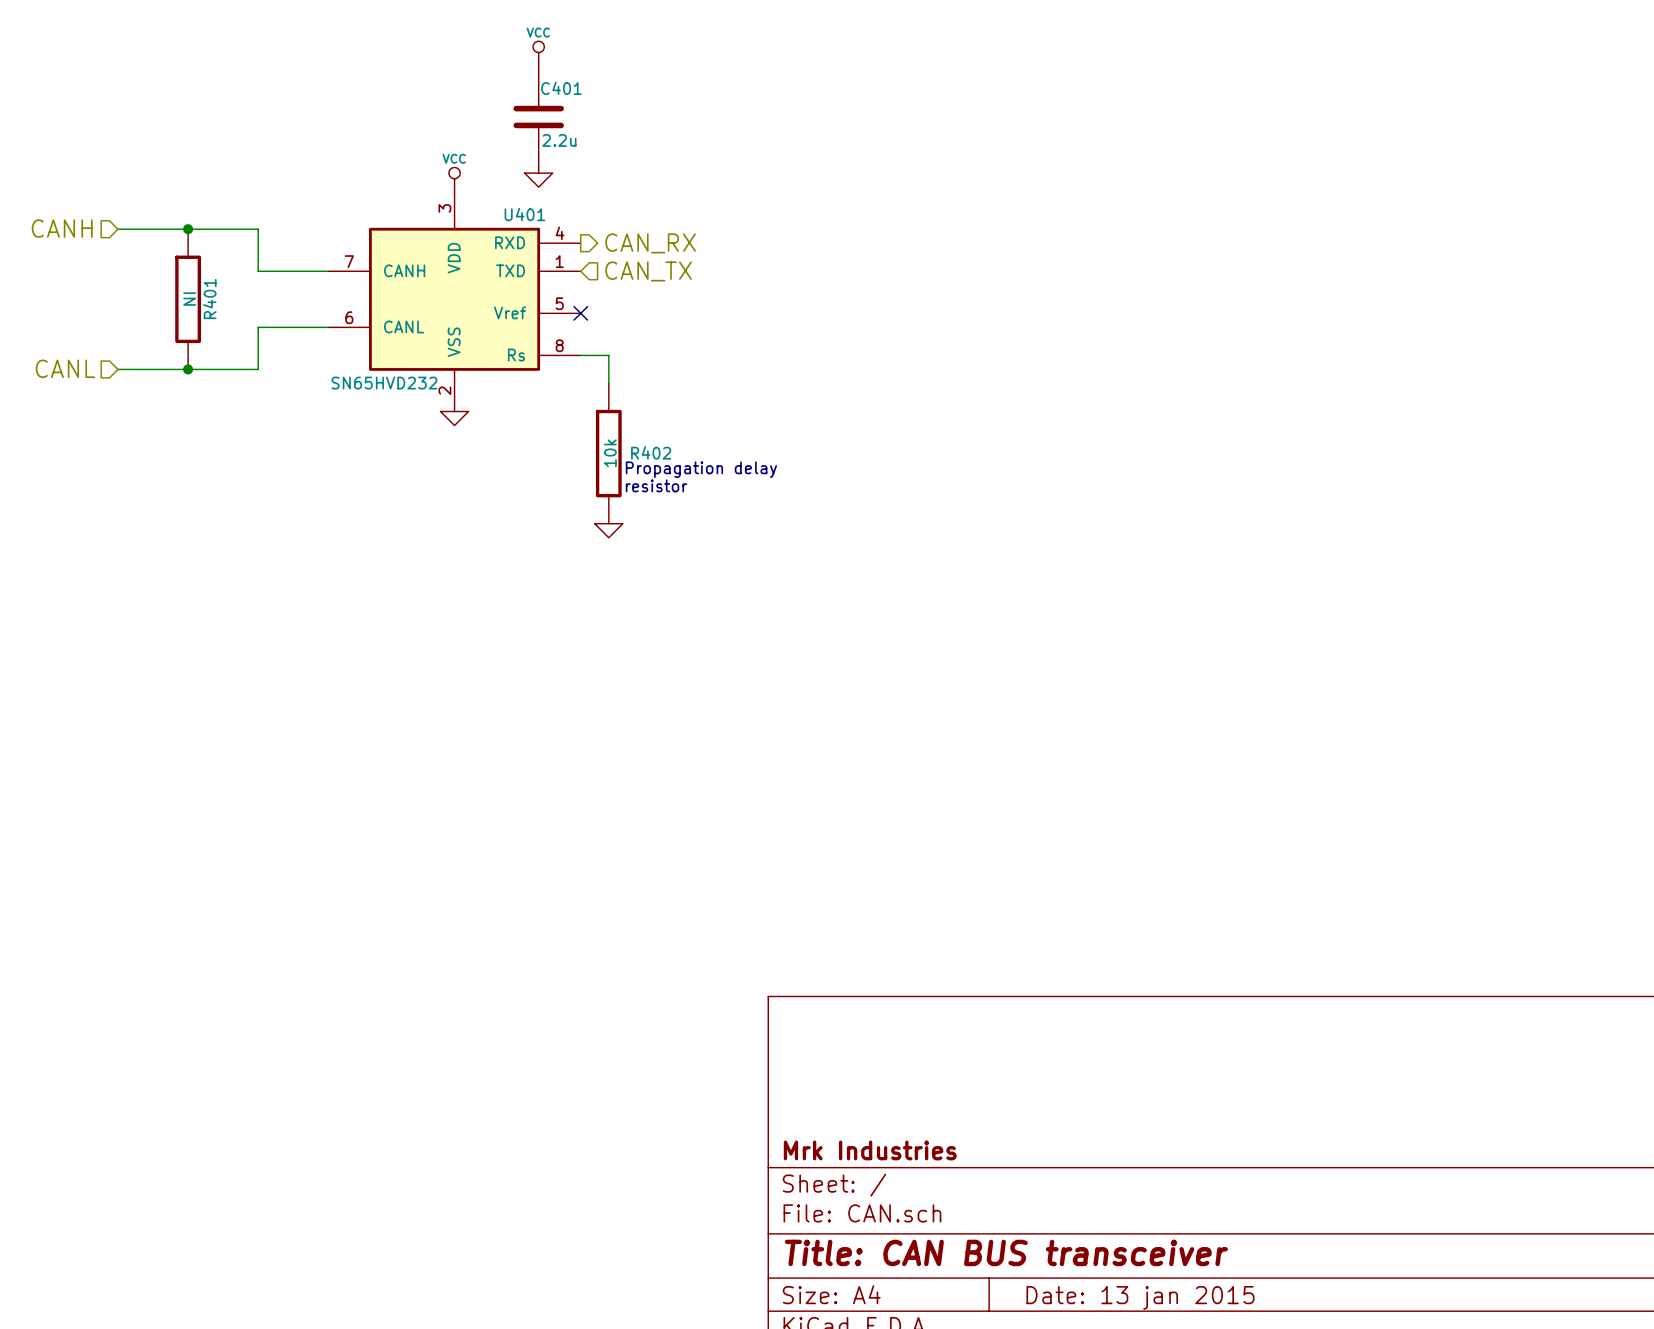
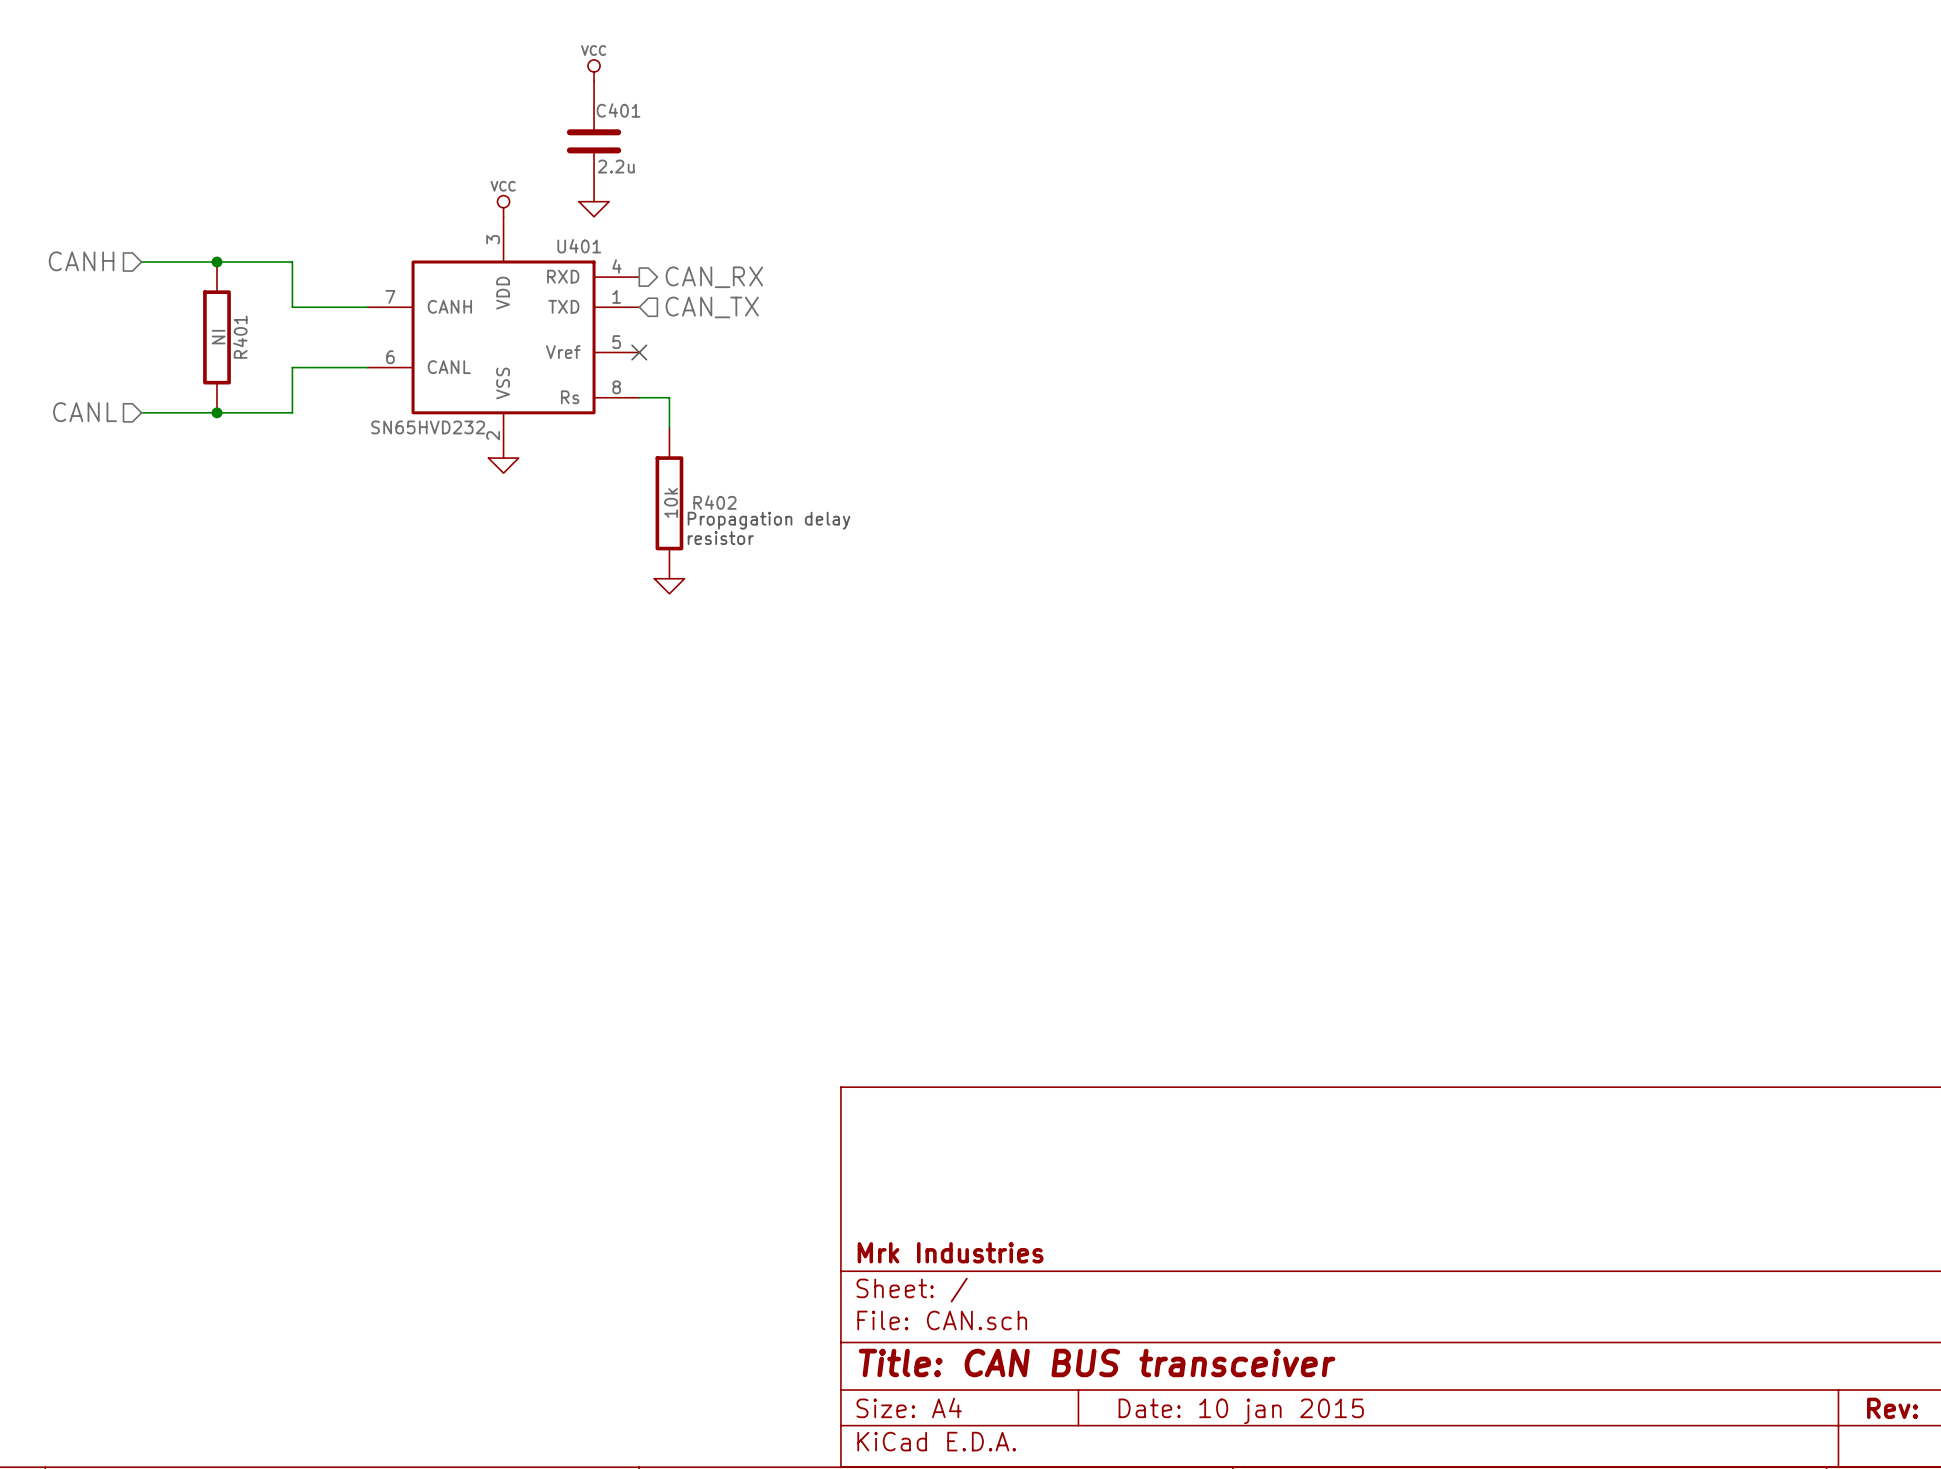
title block: Date: 13 jan 2015 (1140, 1297) -> Date: 10 jan 2015 (1241, 1411)

